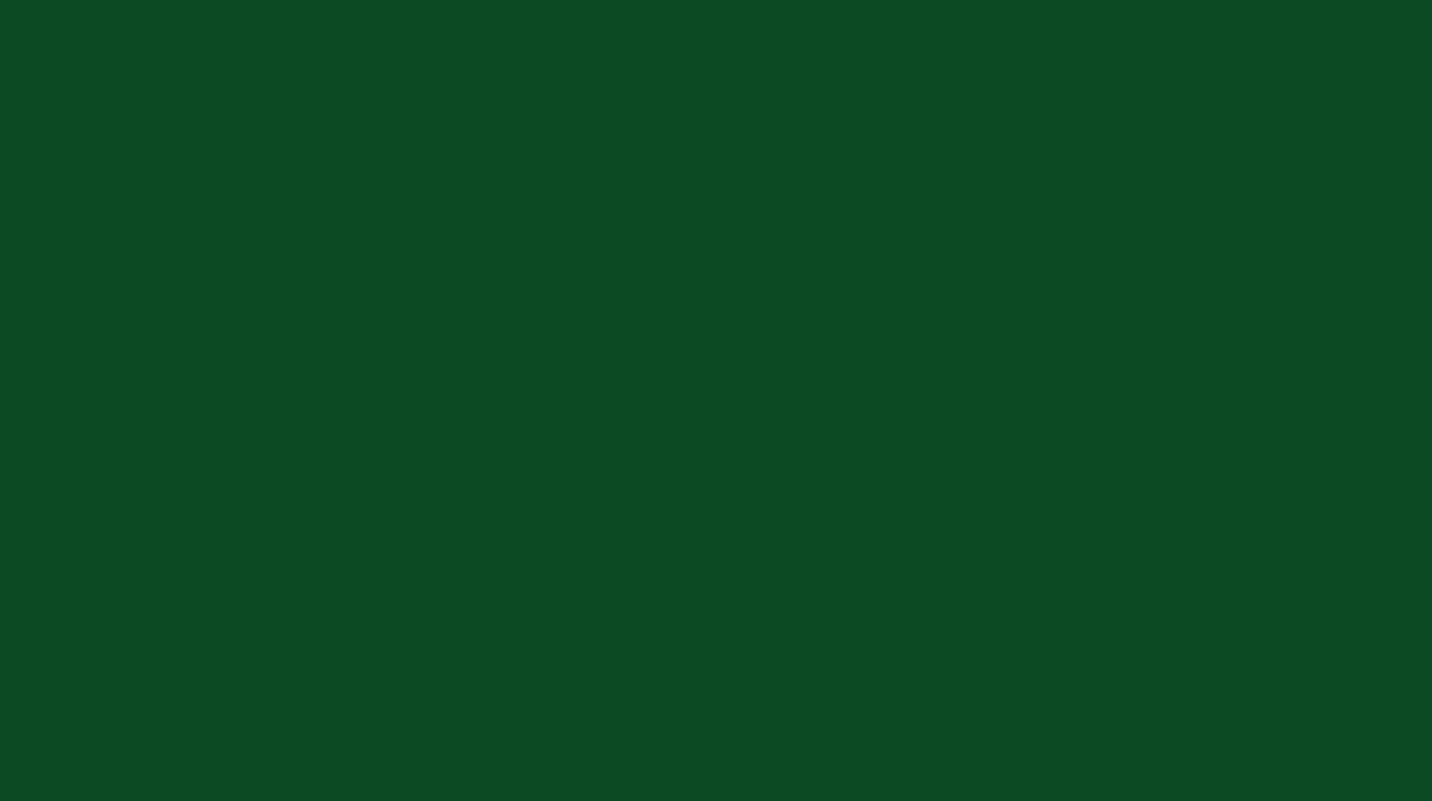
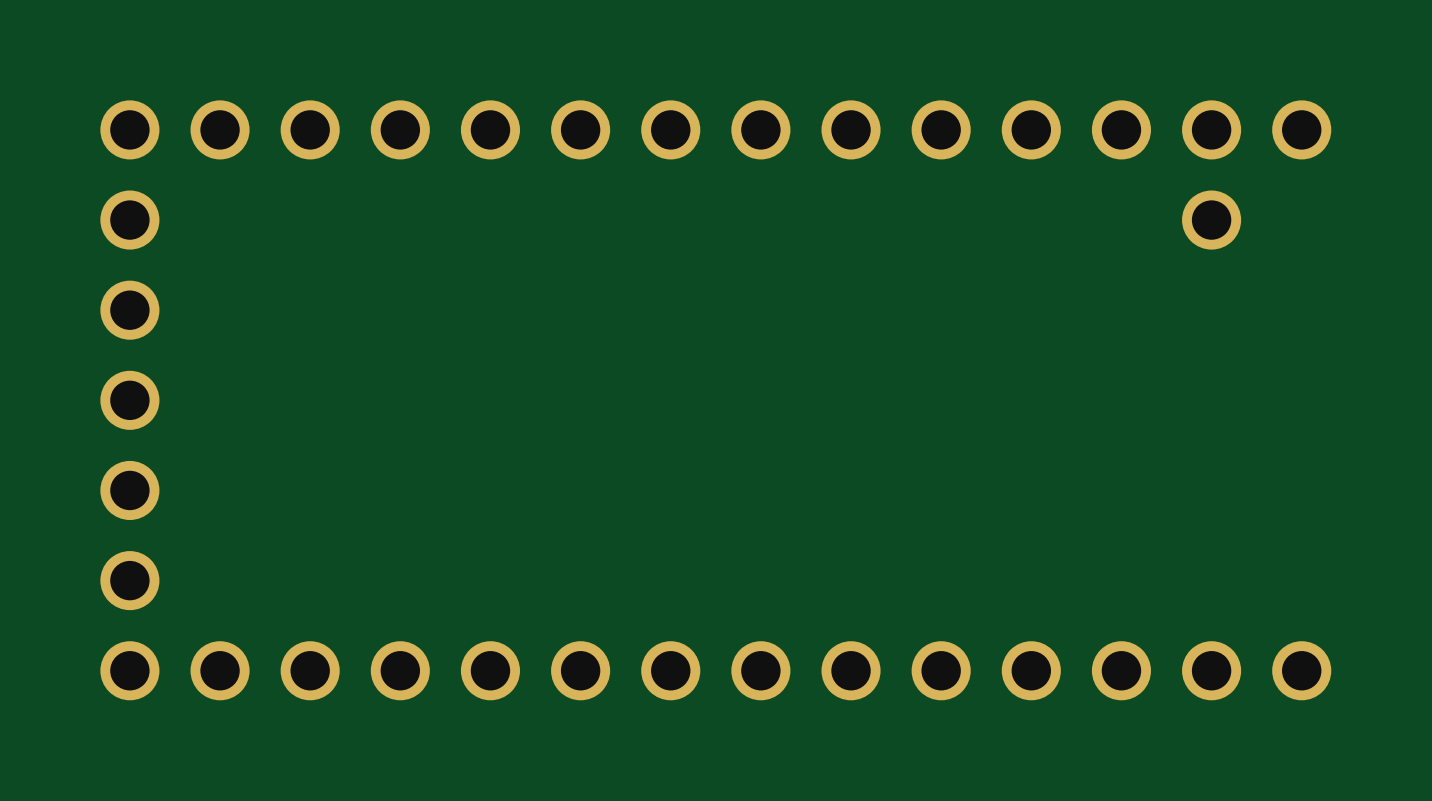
part: none -> (715, 400)

